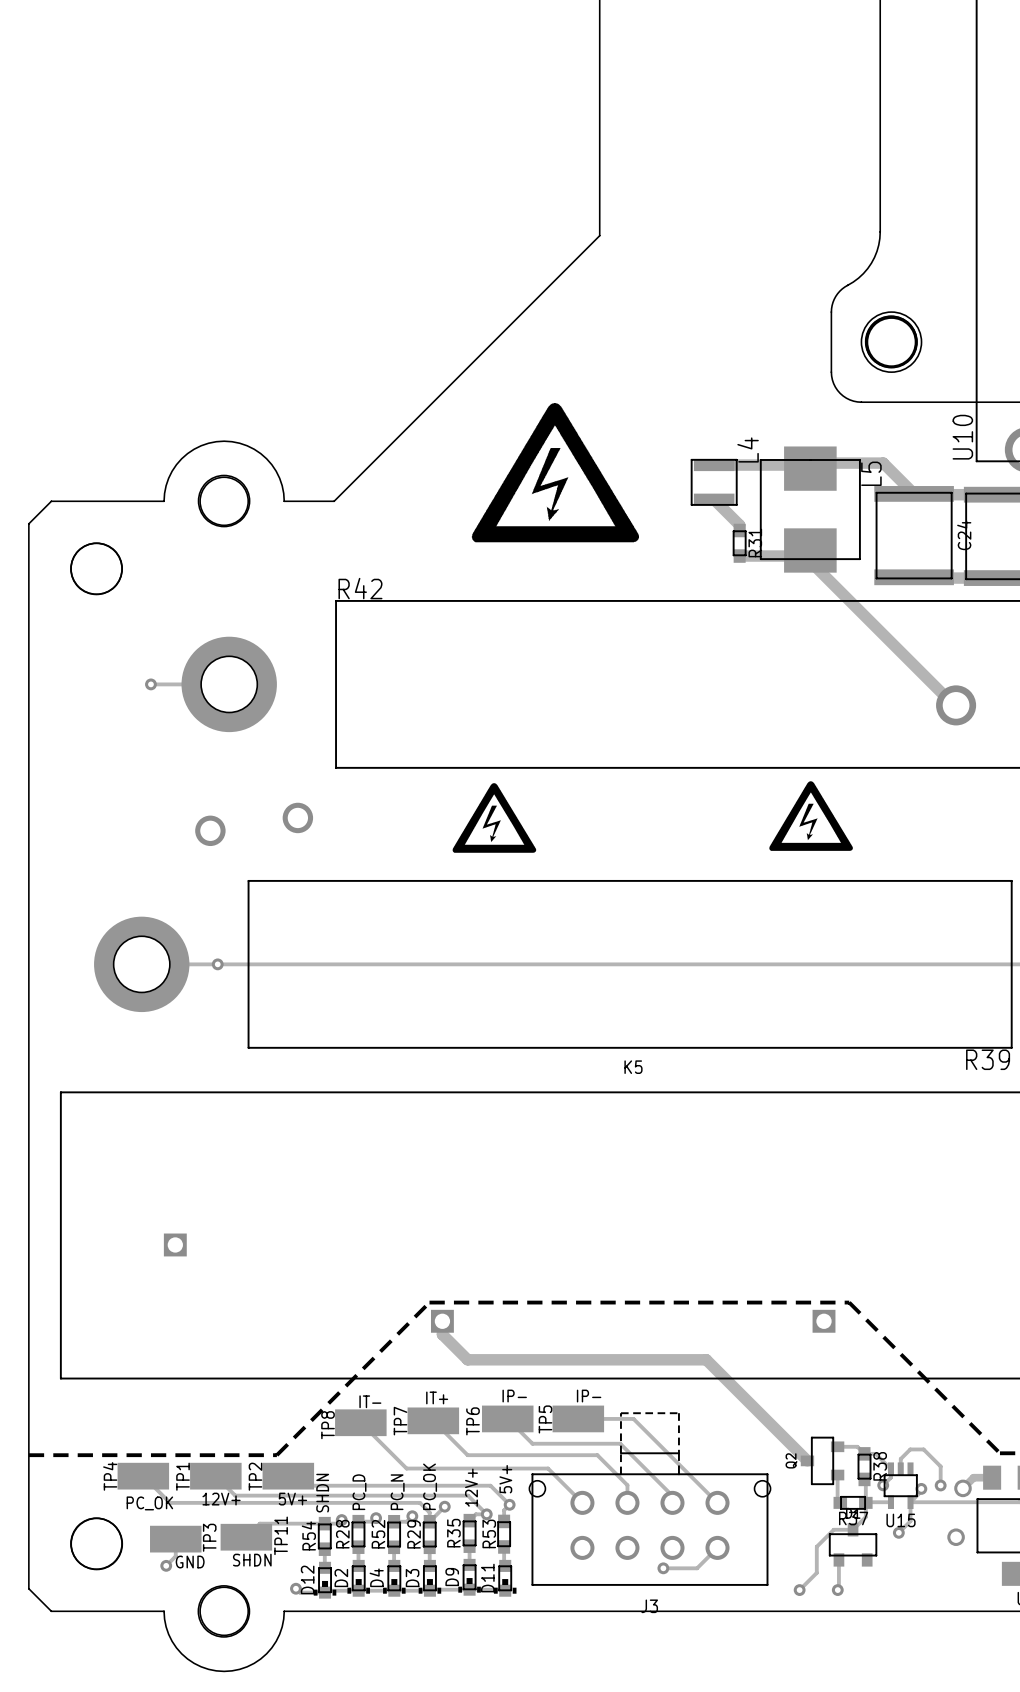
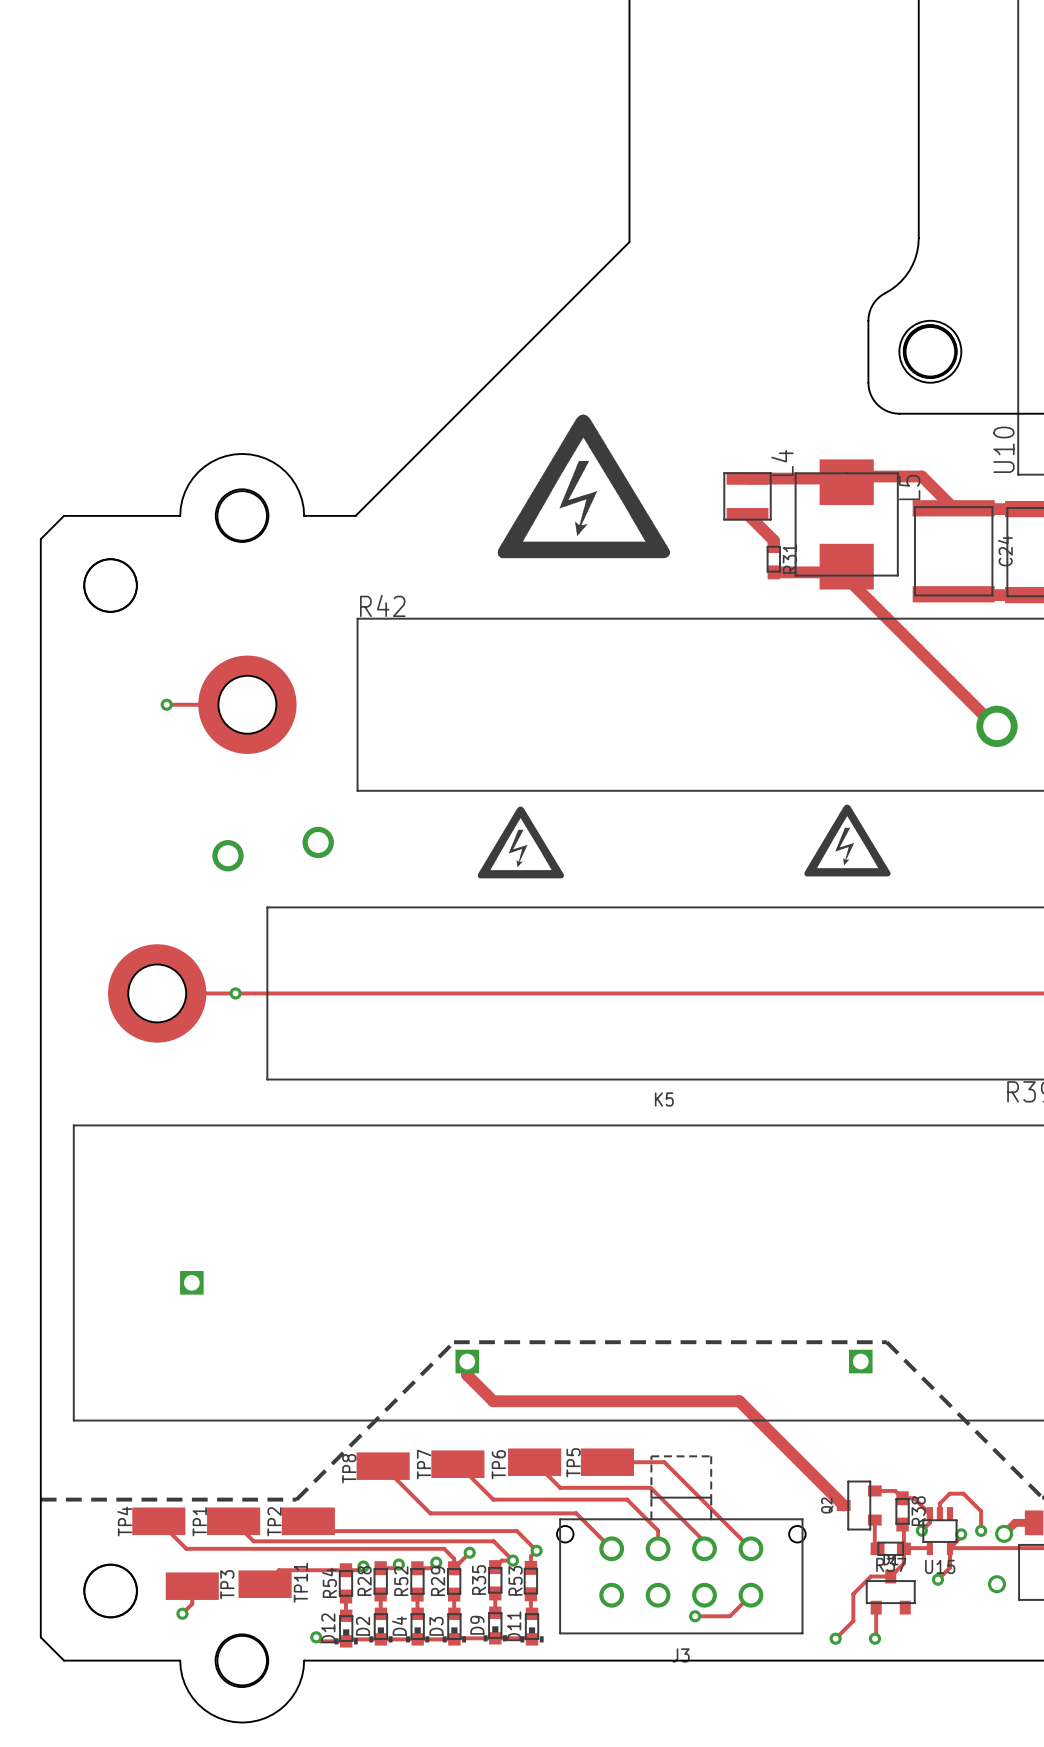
text: IP- (514, 1396) -> none
text: IP- (589, 1396) -> none
text: IT+ (437, 1397) -> none
text: IT- (370, 1401) -> none
text: 5V+ (505, 1479) -> none
text: PC_OK (430, 1486) -> none
text: 12V+ (471, 1487) -> none
text: PC_D (359, 1492) -> none
text: PC_N (397, 1492) -> none
text: SHDN (322, 1493) -> none
text: 12V+ (221, 1499) -> none
text: 5V+ (292, 1499) -> none
text: PC_OK (149, 1503) -> none
text: SHDN (252, 1560) -> none
text: GND (190, 1562) -> none

